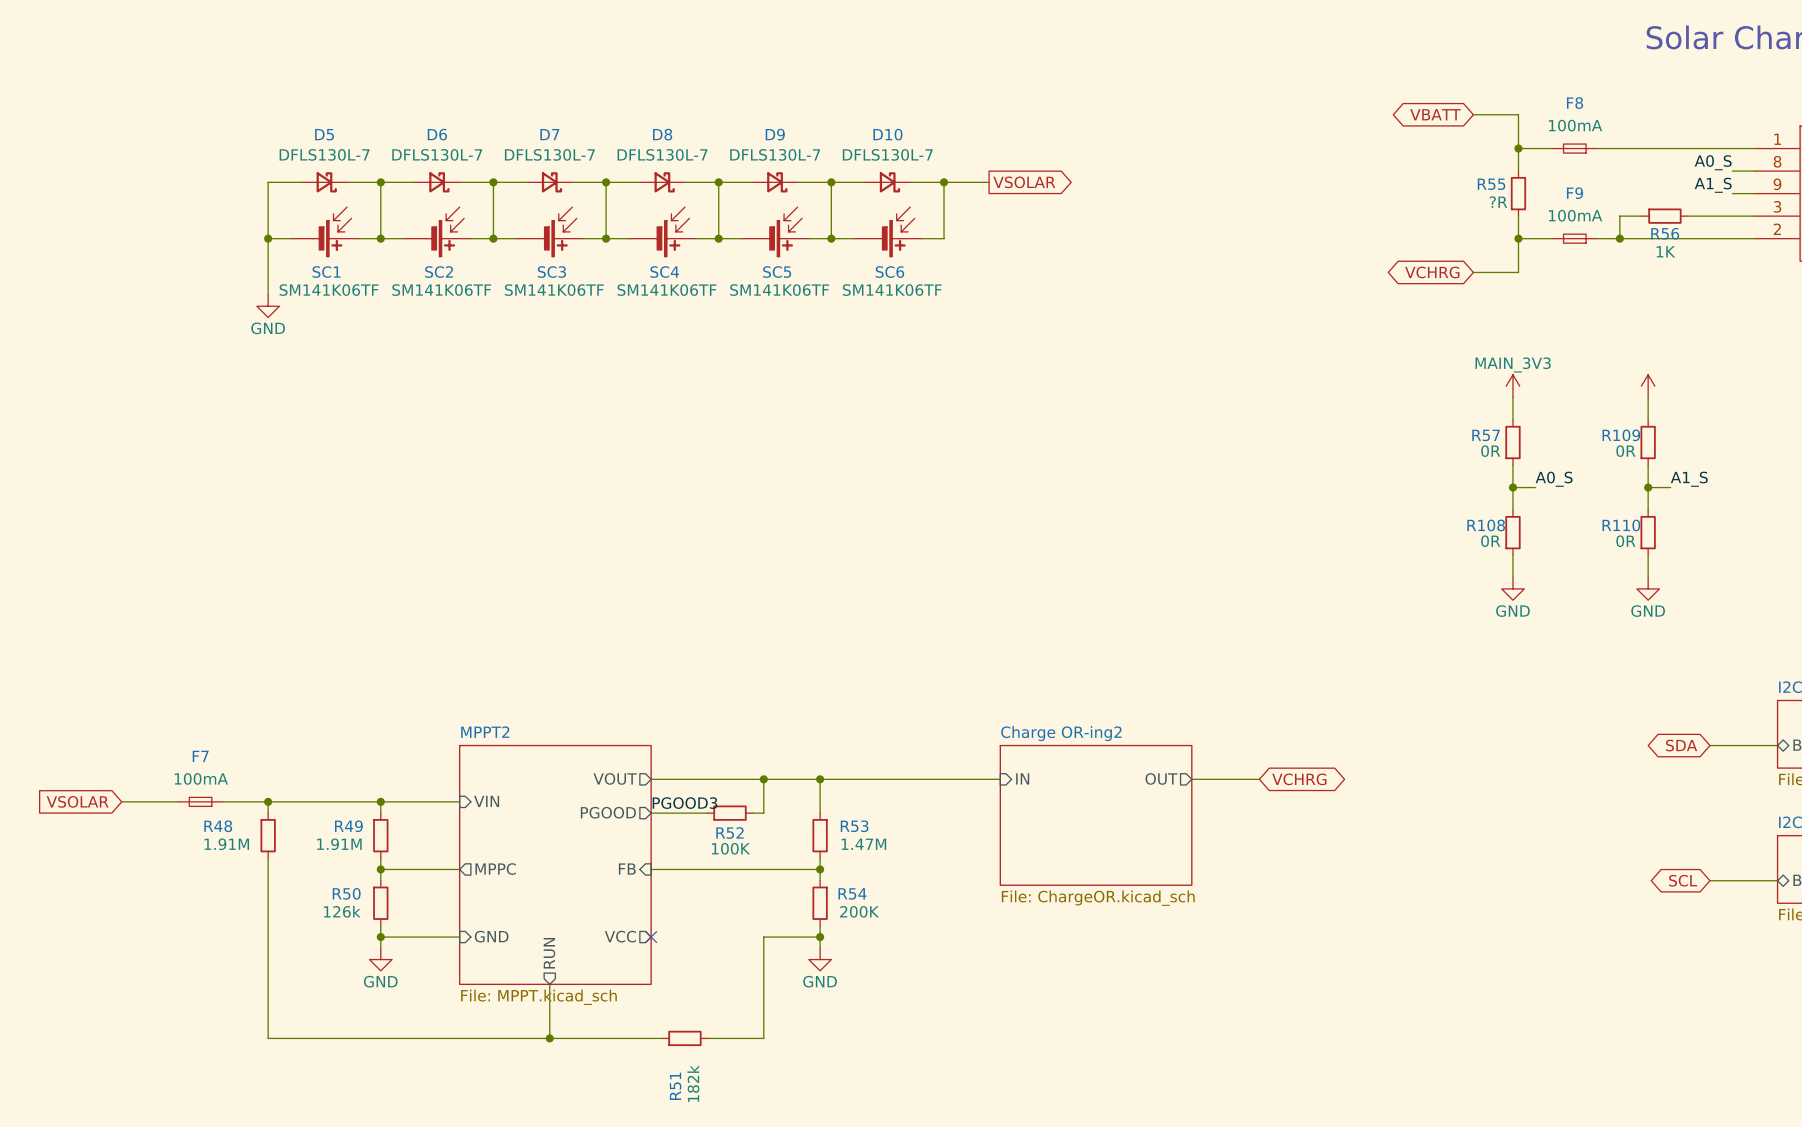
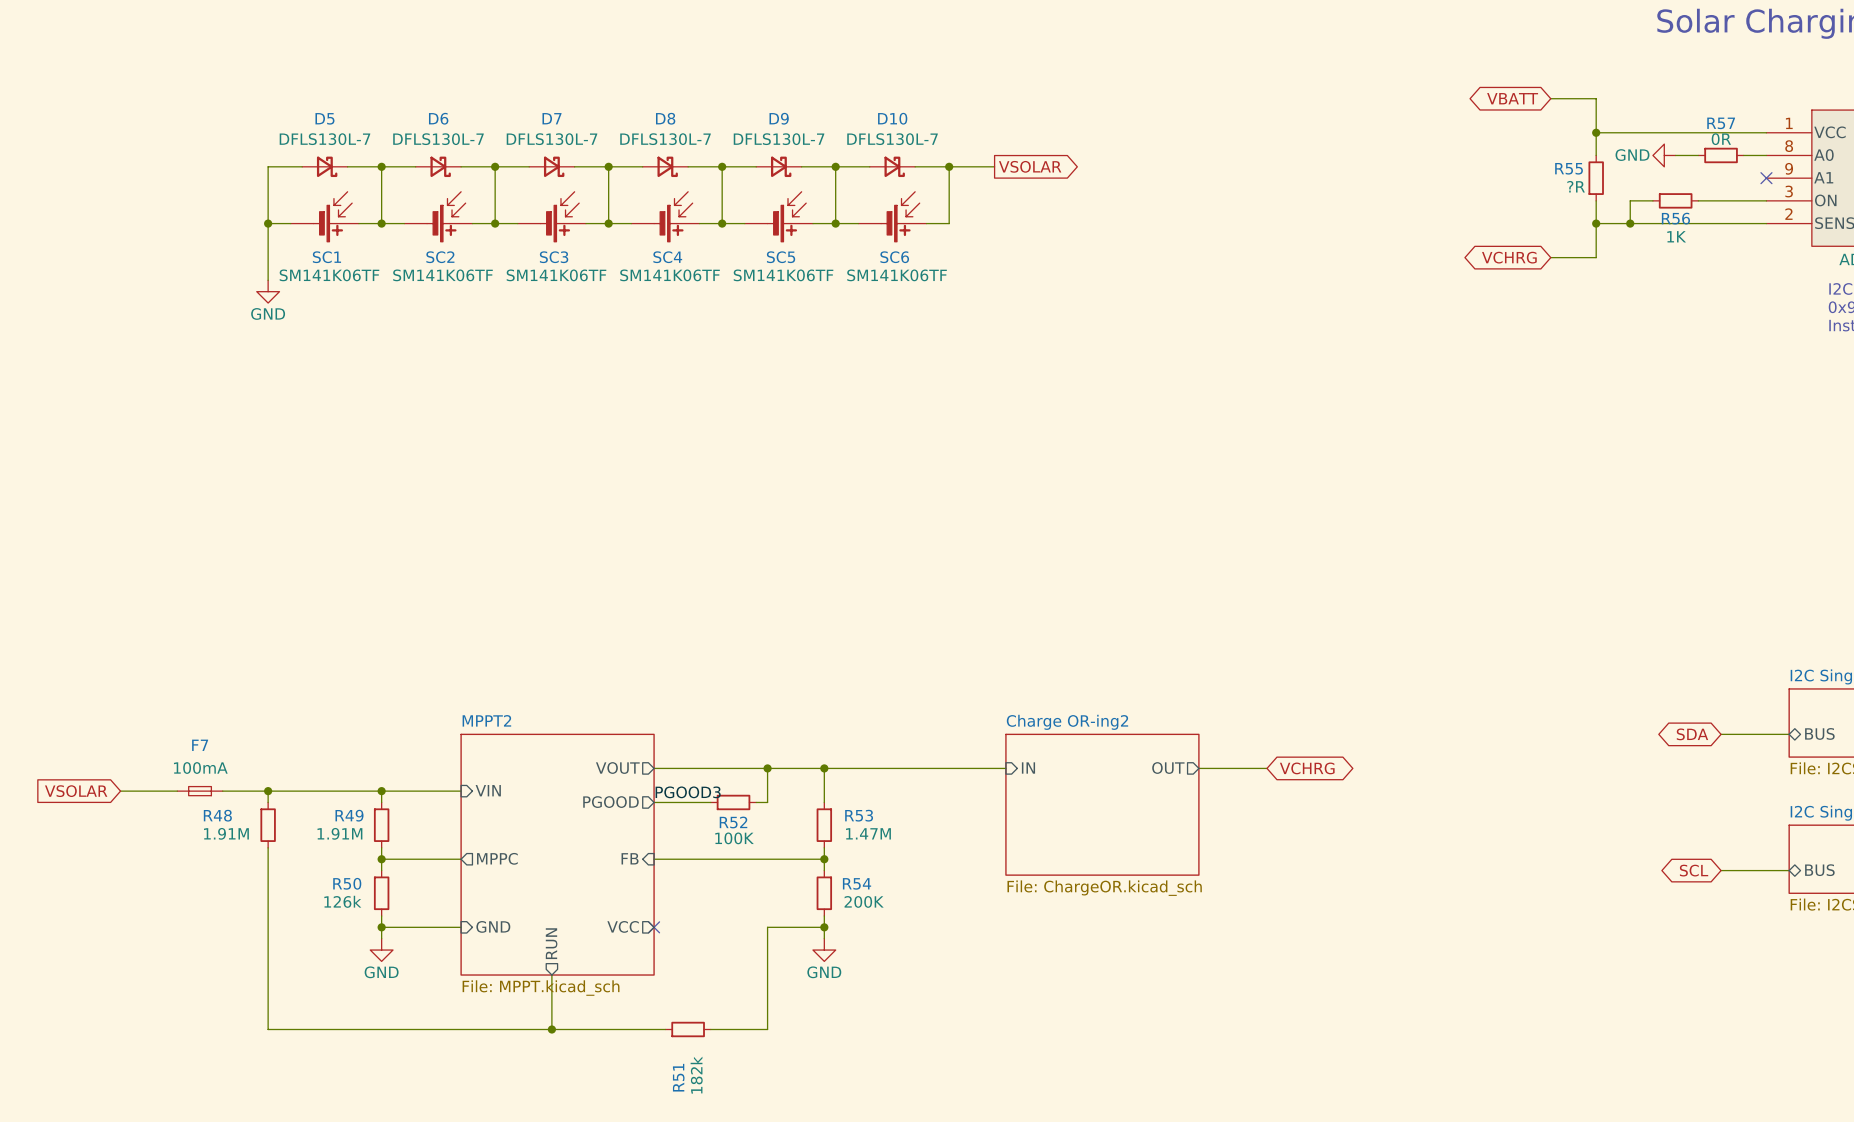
global label position: VBATT (1435, 114) -> VBATT (1512, 98)
wire: (1473, 114) (1518, 114) (1518, 171) -> (1550, 98) (1596, 98) (1596, 155)
wire: (1518, 148) (1552, 148) -> none
junction: (1518, 148) -> none
F8: 100mA (1574, 148) -> none
junction: none -> (1596, 132)
label: A0_S (1713, 162) -> none
power symbol: none -> GND (1664, 155)
label: A1_S (1713, 185) -> none
R55 position: (1518, 193) -> (1596, 178)
wire: (1732, 193) (1755, 193) -> (1675, 155) (1698, 155)
no-connect mark: none -> (1766, 178)
wire: (1518, 216) (1518, 272) (1473, 272) -> (1596, 200) (1596, 257) (1550, 257)
wire: (1518, 238) (1552, 238) -> none
junction: (1518, 238) -> none
F9: 100mA (1574, 238) -> none
junction: none -> (1596, 223)
global label position: VCHRG (1432, 272) -> VCHRG (1509, 257)
power symbol: MAIN_3V3 (1512, 386) -> none
power symbol: (1648, 386) -> none
wire: (1512, 397) (1512, 419) -> none
wire: (1648, 397) (1648, 419) -> none
R57 rotation: 0° (1512, 442) -> 90° clockwise (1721, 155)
R57 position: (1512, 442) -> (1721, 155)
R109: 0R (1648, 442) -> none
wire: (1512, 465) (1512, 510) -> none
wire: (1648, 465) (1648, 510) -> none
label: A0_S (1554, 479) -> none
label: A1_S (1689, 479) -> none
wire: (1512, 487) (1535, 487) -> none
junction: (1512, 487) -> none
wire: (1648, 487) (1670, 487) -> none
junction: (1648, 487) -> none
R108: 0R (1512, 532) -> none
R110: 0R (1648, 532) -> none
wire: (1512, 555) (1512, 577) -> none
wire: (1648, 555) (1648, 577) -> none
power symbol: GND (1512, 588) -> none
power symbol: GND (1648, 588) -> none

